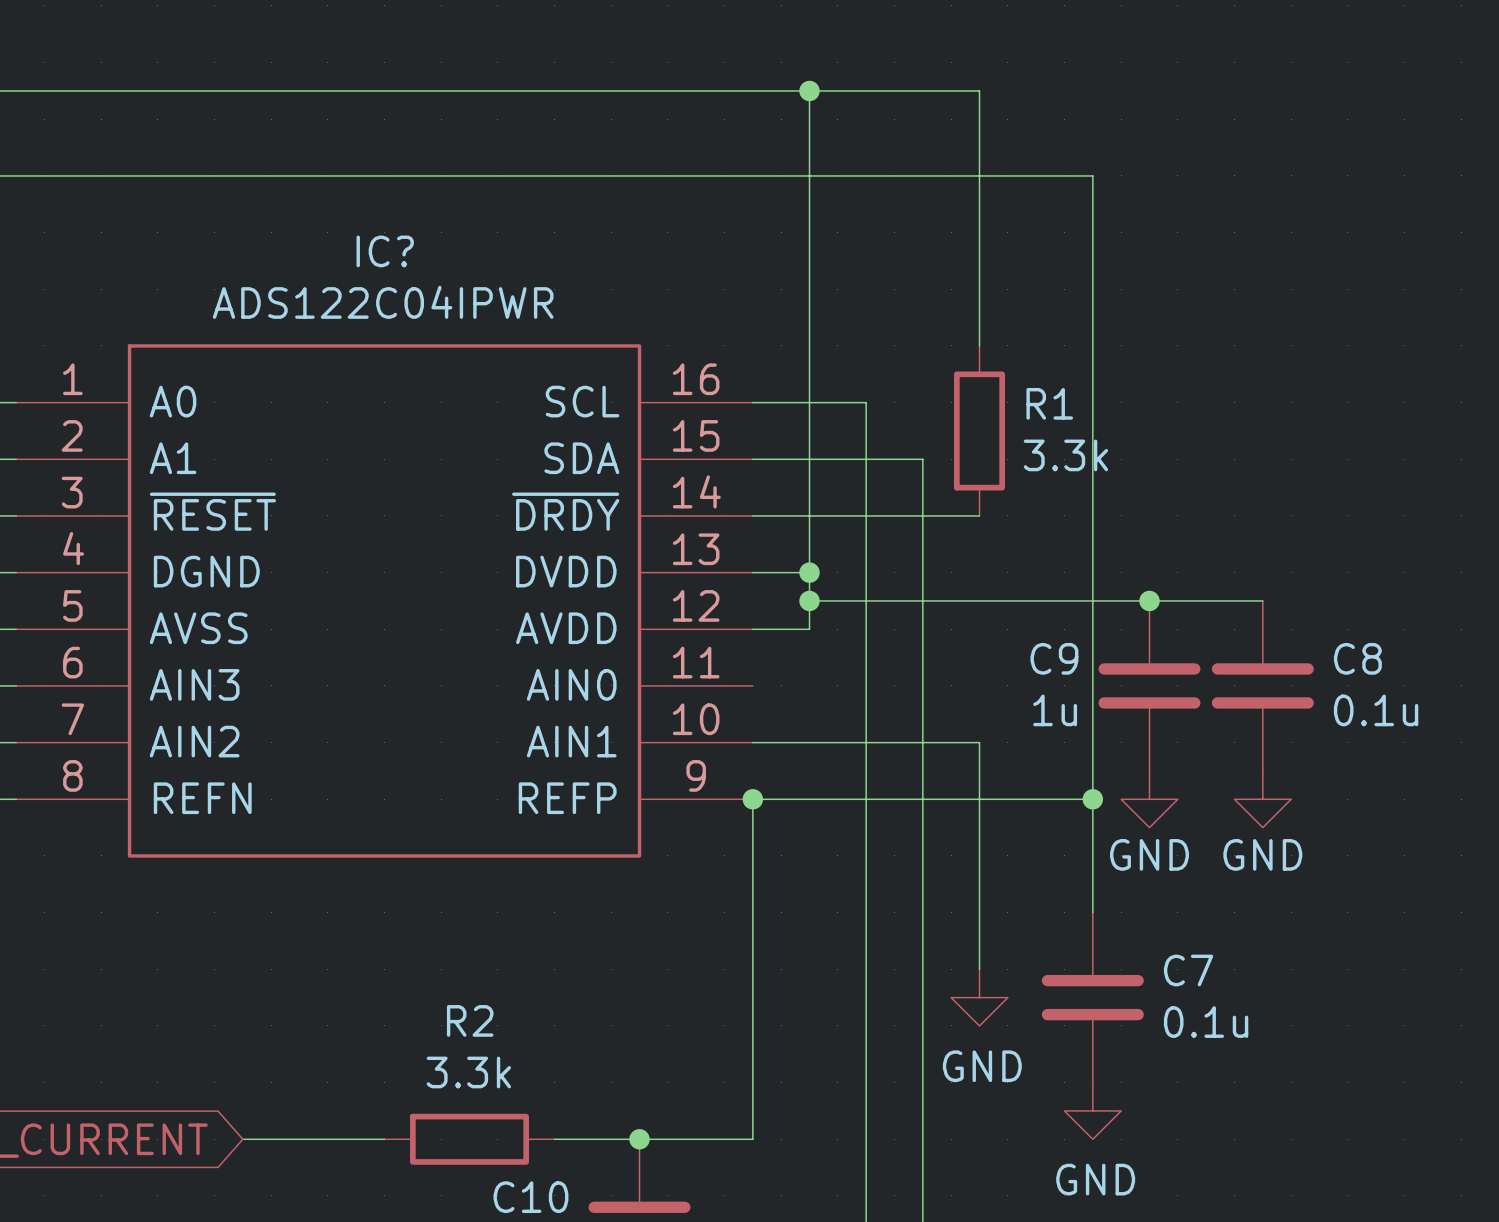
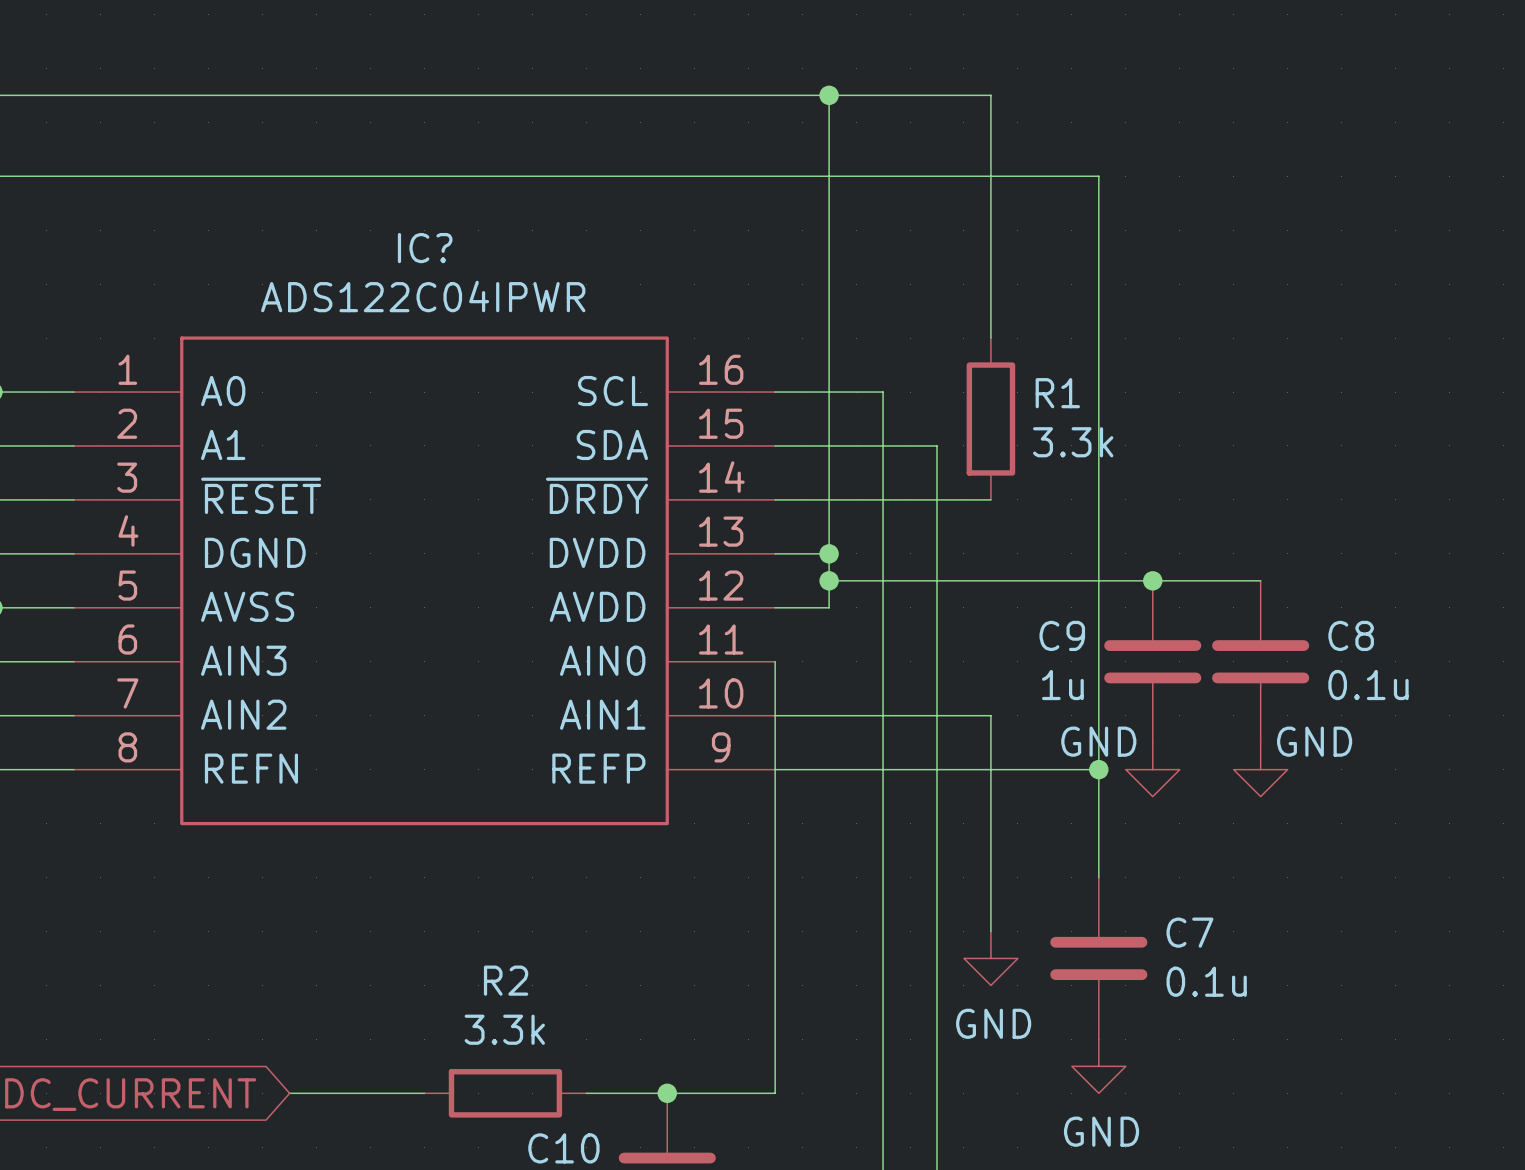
wire: none -> (775, 661) (775, 769)
junction: (752, 799) -> none
power symbol text position: GND (1149, 854) -> GND (1098, 741)
power symbol text position: GND (1262, 854) -> GND (1314, 741)

